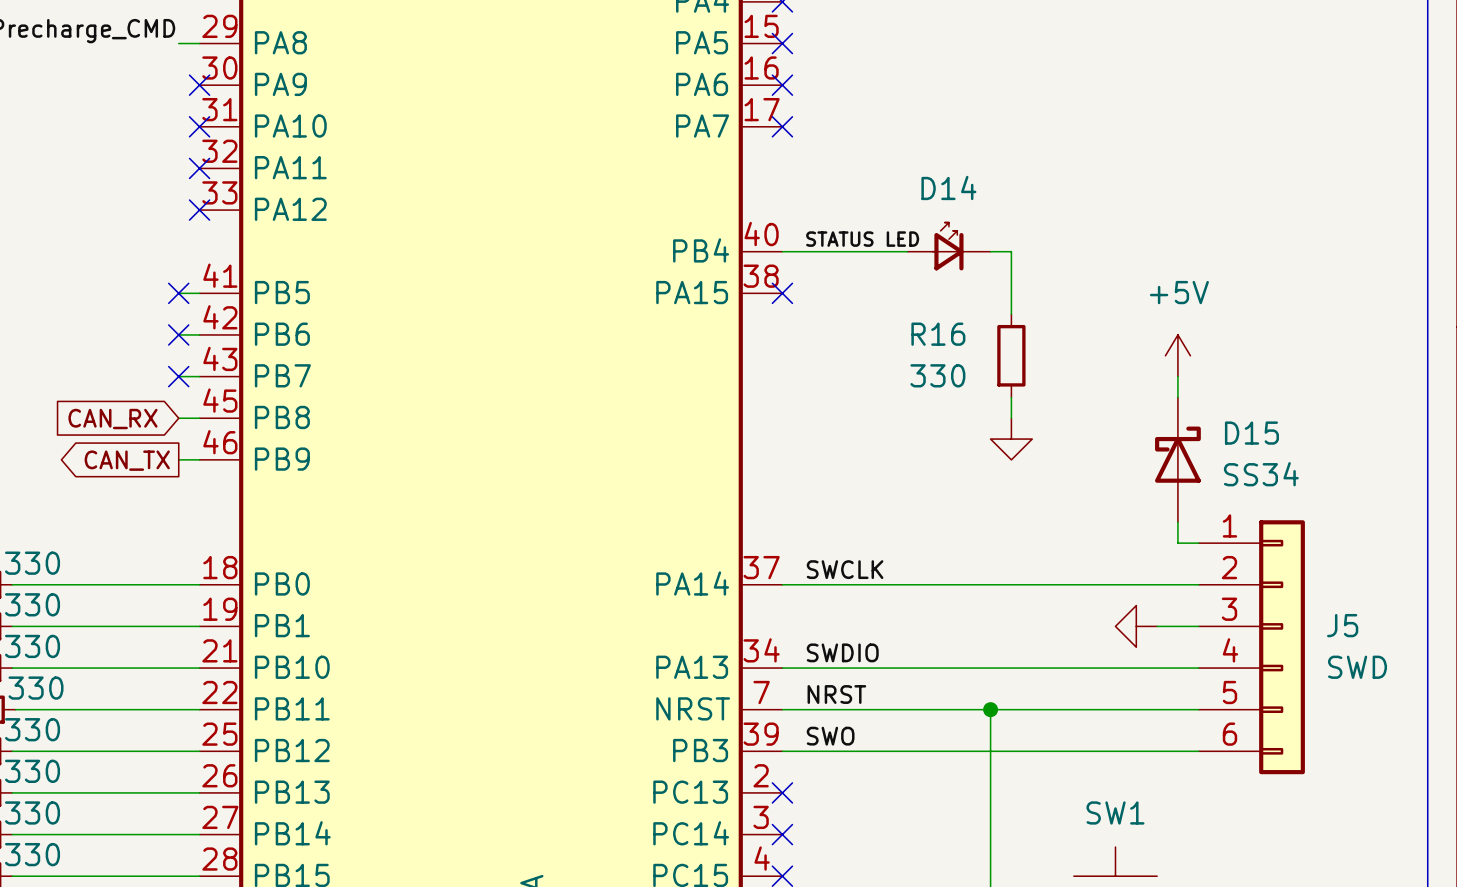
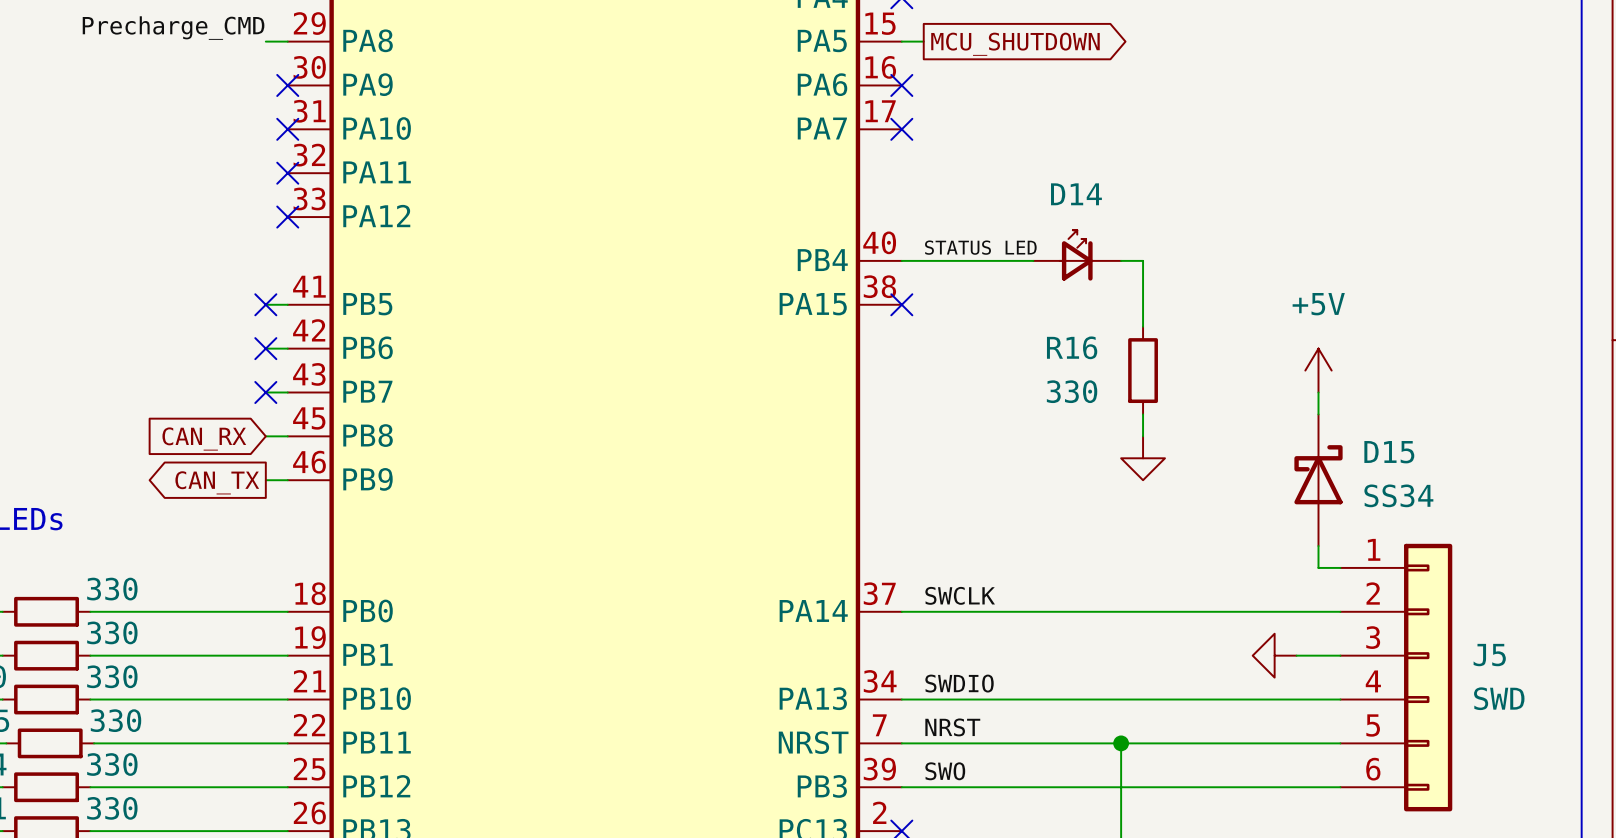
wire: none -> (901, 41) (923, 41)
no-connect mark: (782, 43) -> none
global label: none -> MCU_SHUTDOWN (1015, 44)

